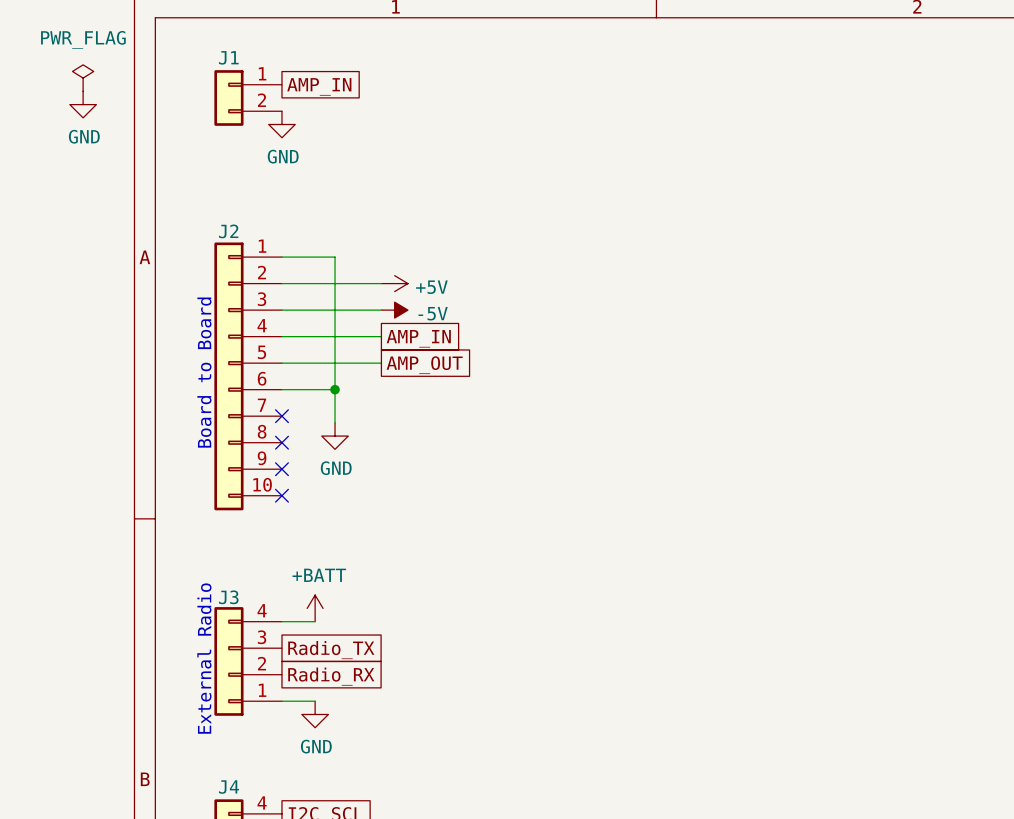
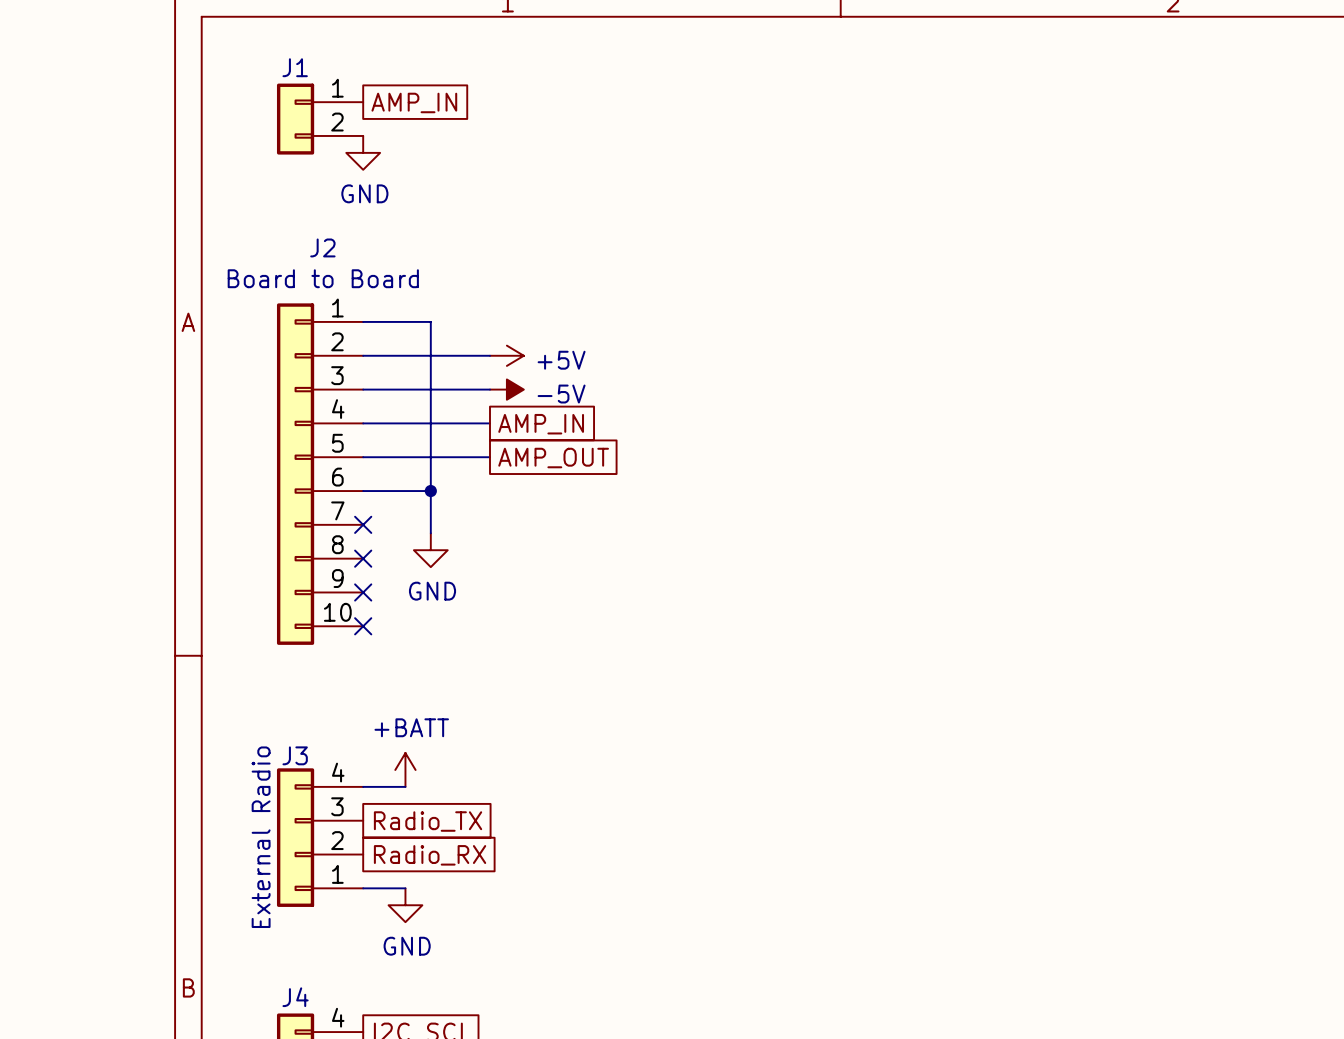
power symbol: PWR_FLAG (83, 78) -> none
power symbol: GND (83, 104) -> none
J2 value: none -> Board to Board (323, 278)
J2 name position: J2 (228, 231) -> J2 (322, 247)
text: Board to Board (204, 372) -> none
text: External Radio (204, 658) -> none
J3 text: none -> External Radio (261, 837)

